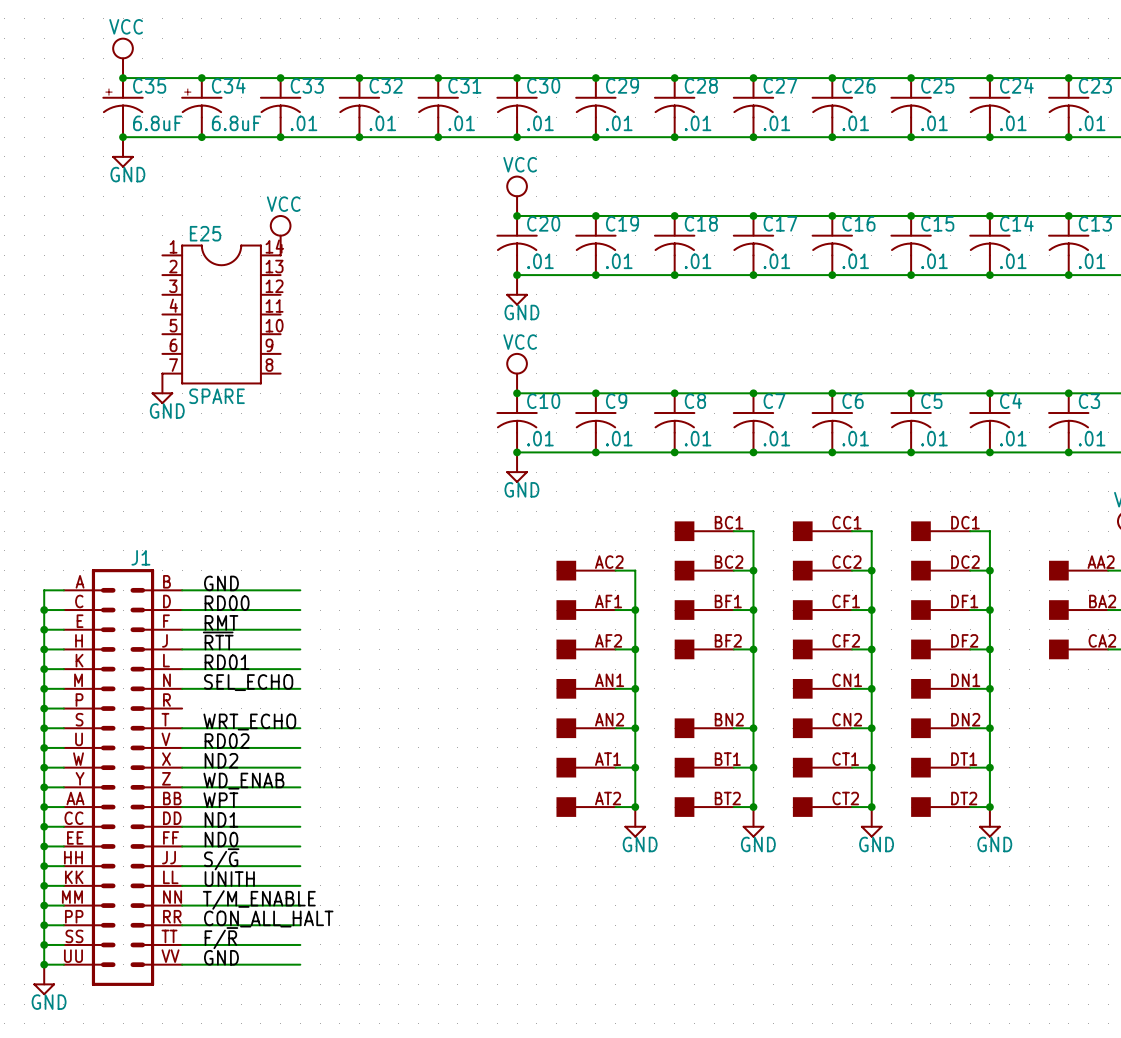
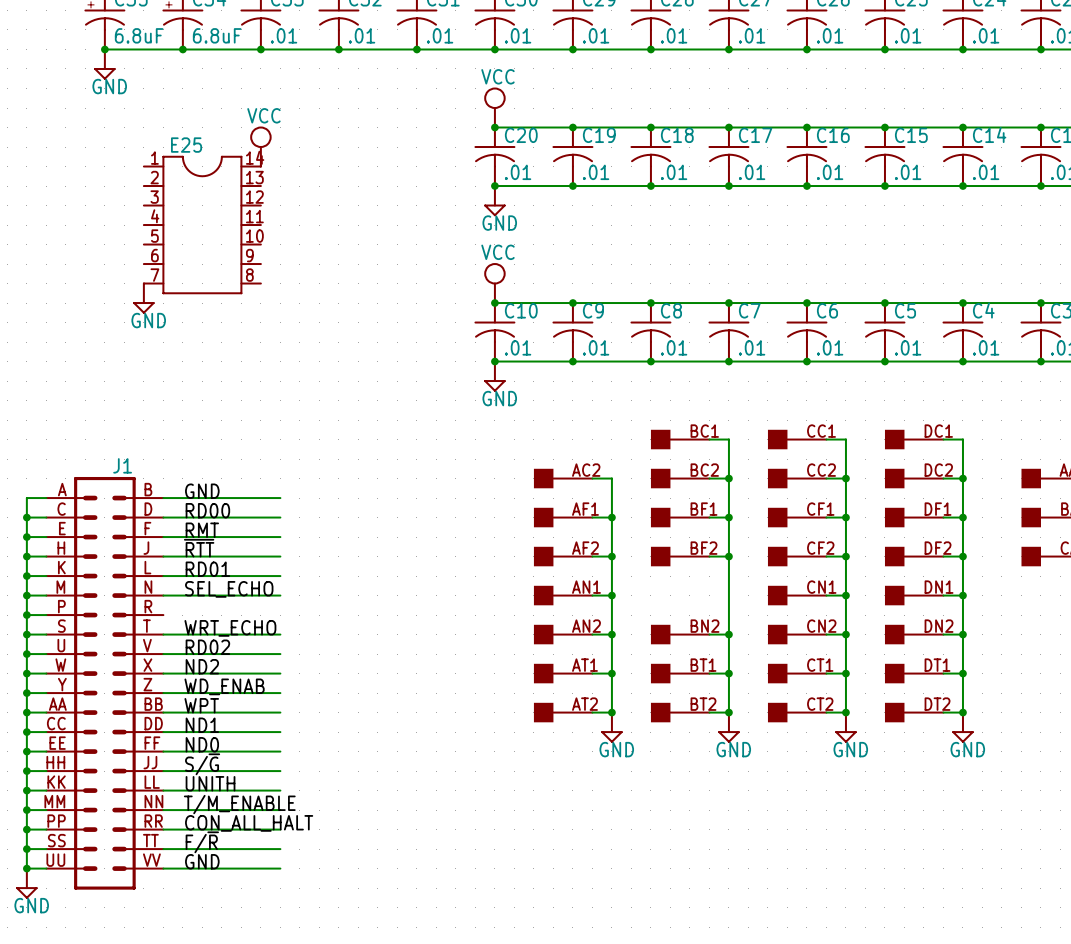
E25 value: SPARE (217, 396) -> none

